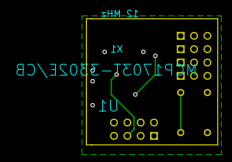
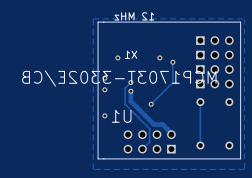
track: none -> (130, 91) (130, 101) (154, 124) (162, 124) (171, 133)
via: none -> (130, 91)

